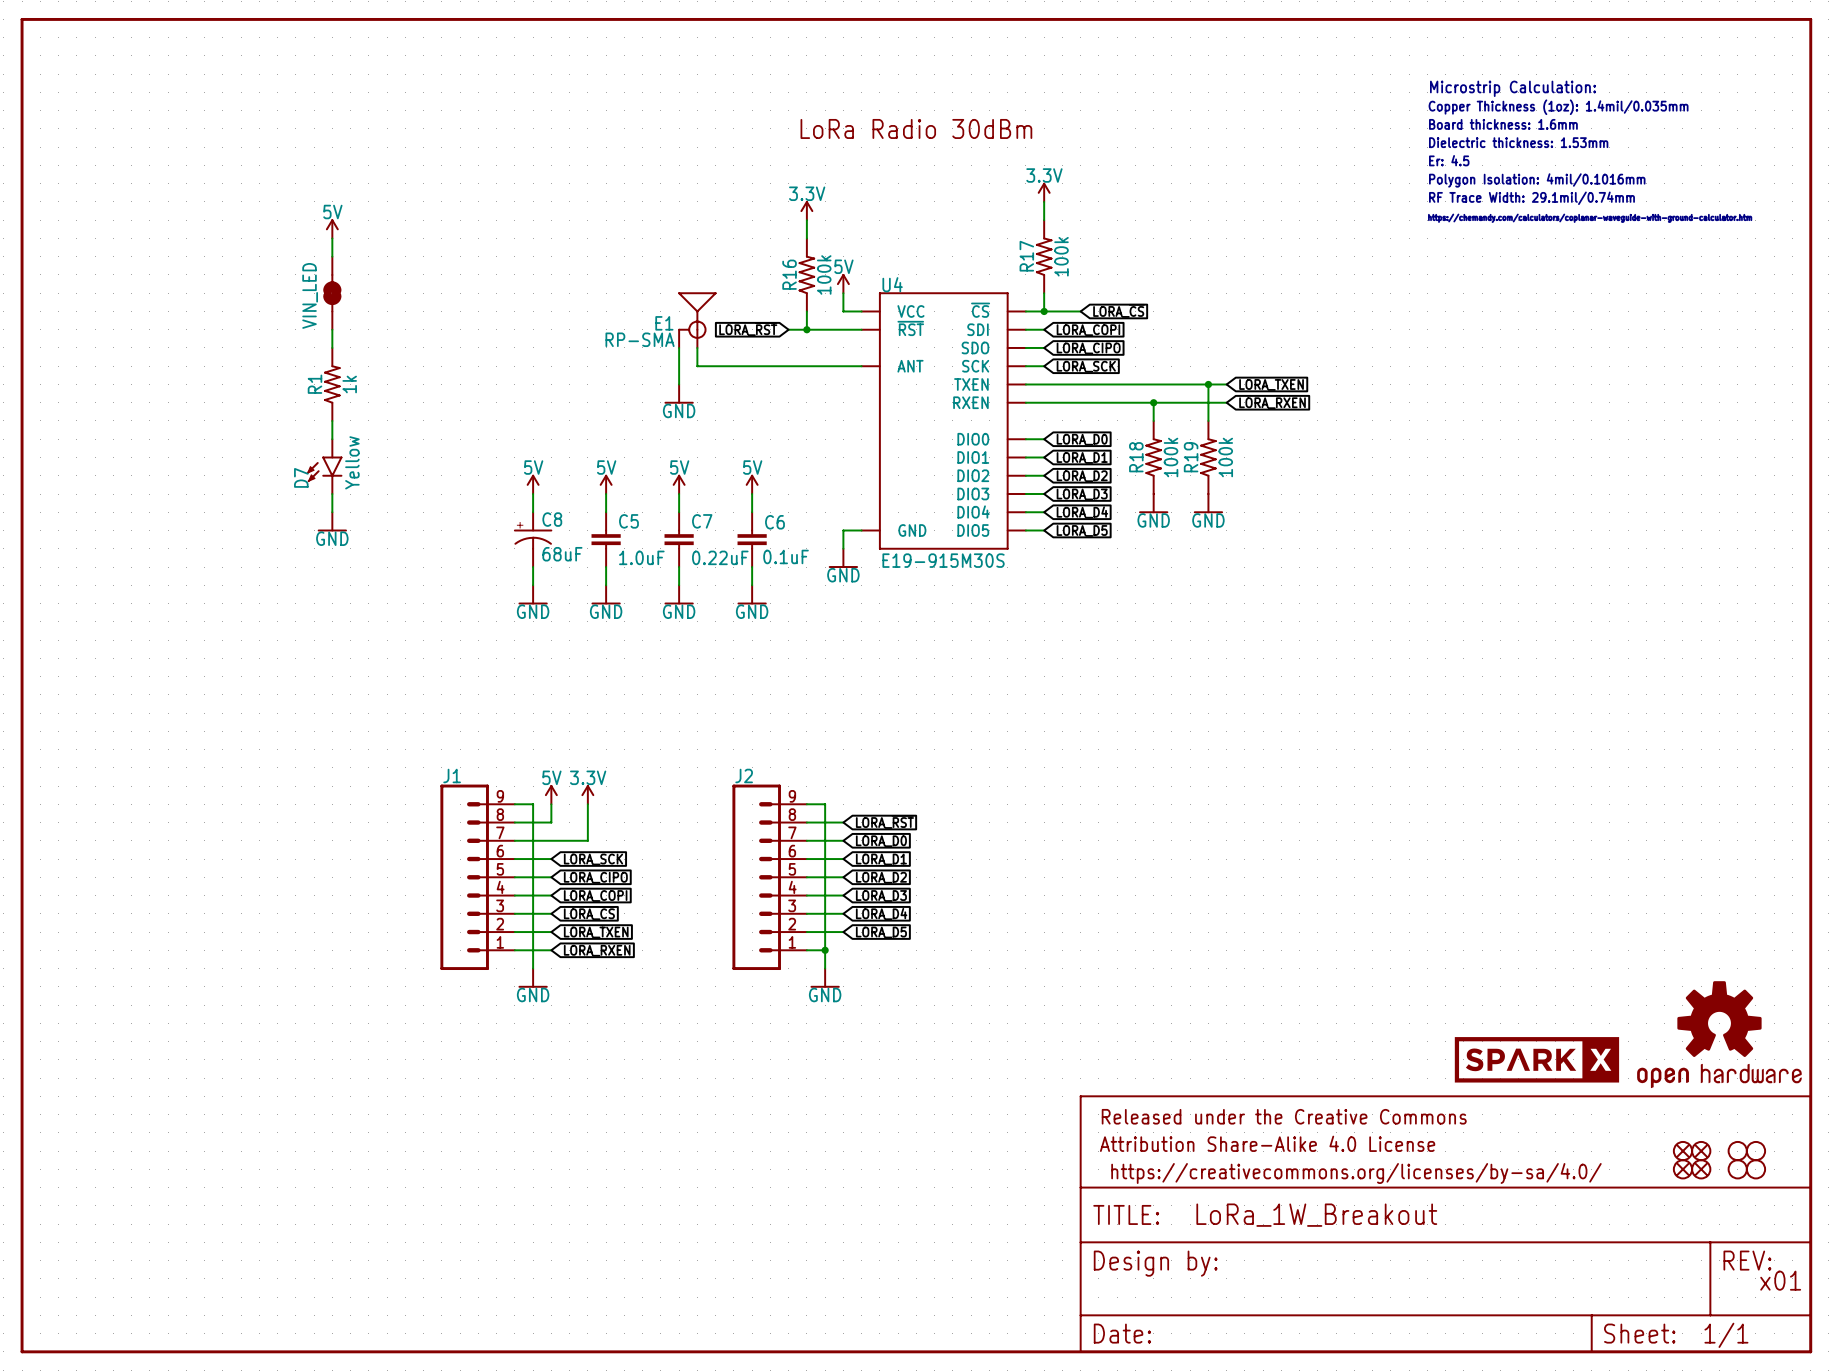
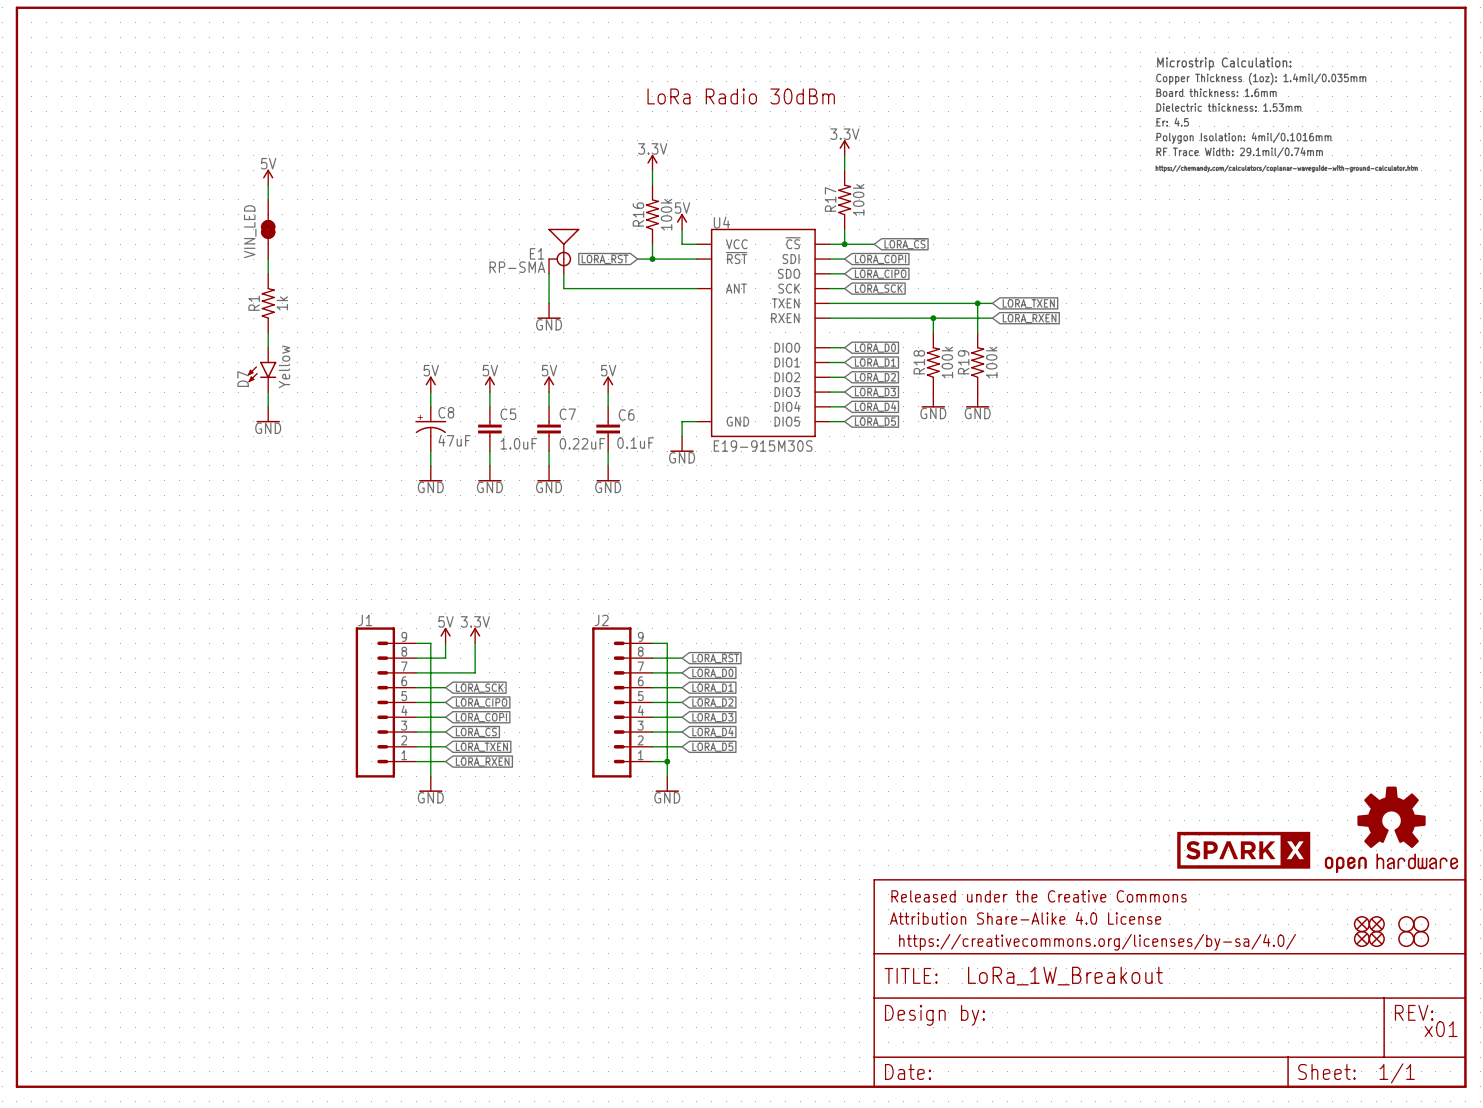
C8 value: 68uF (562, 554) -> 47uF (454, 440)

